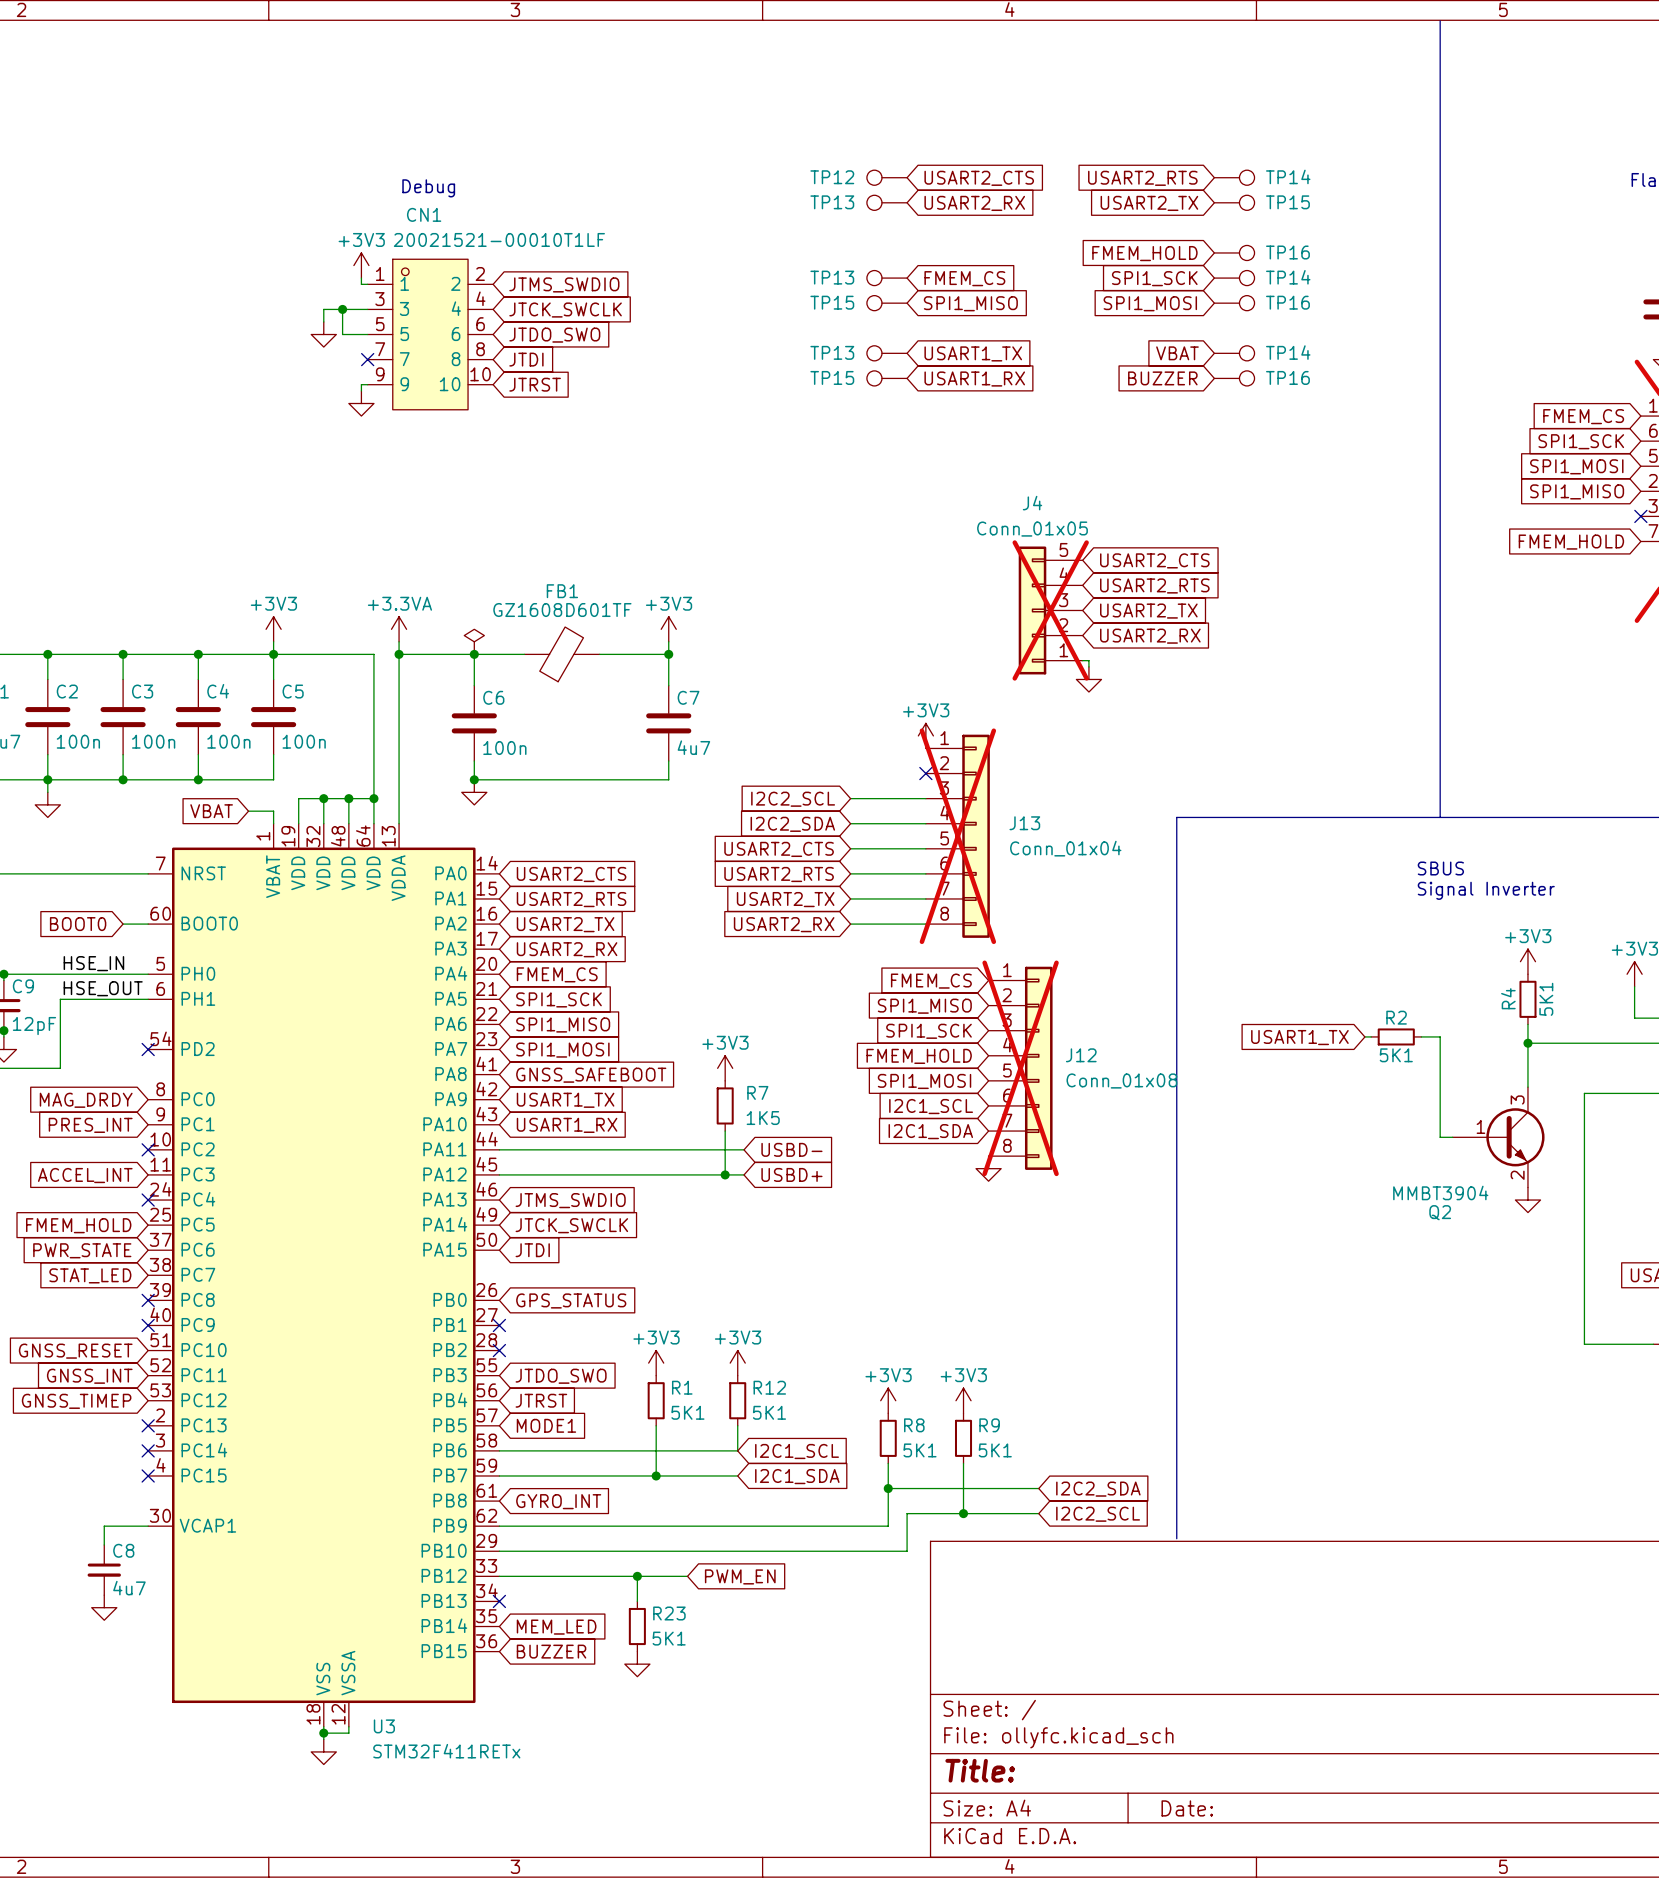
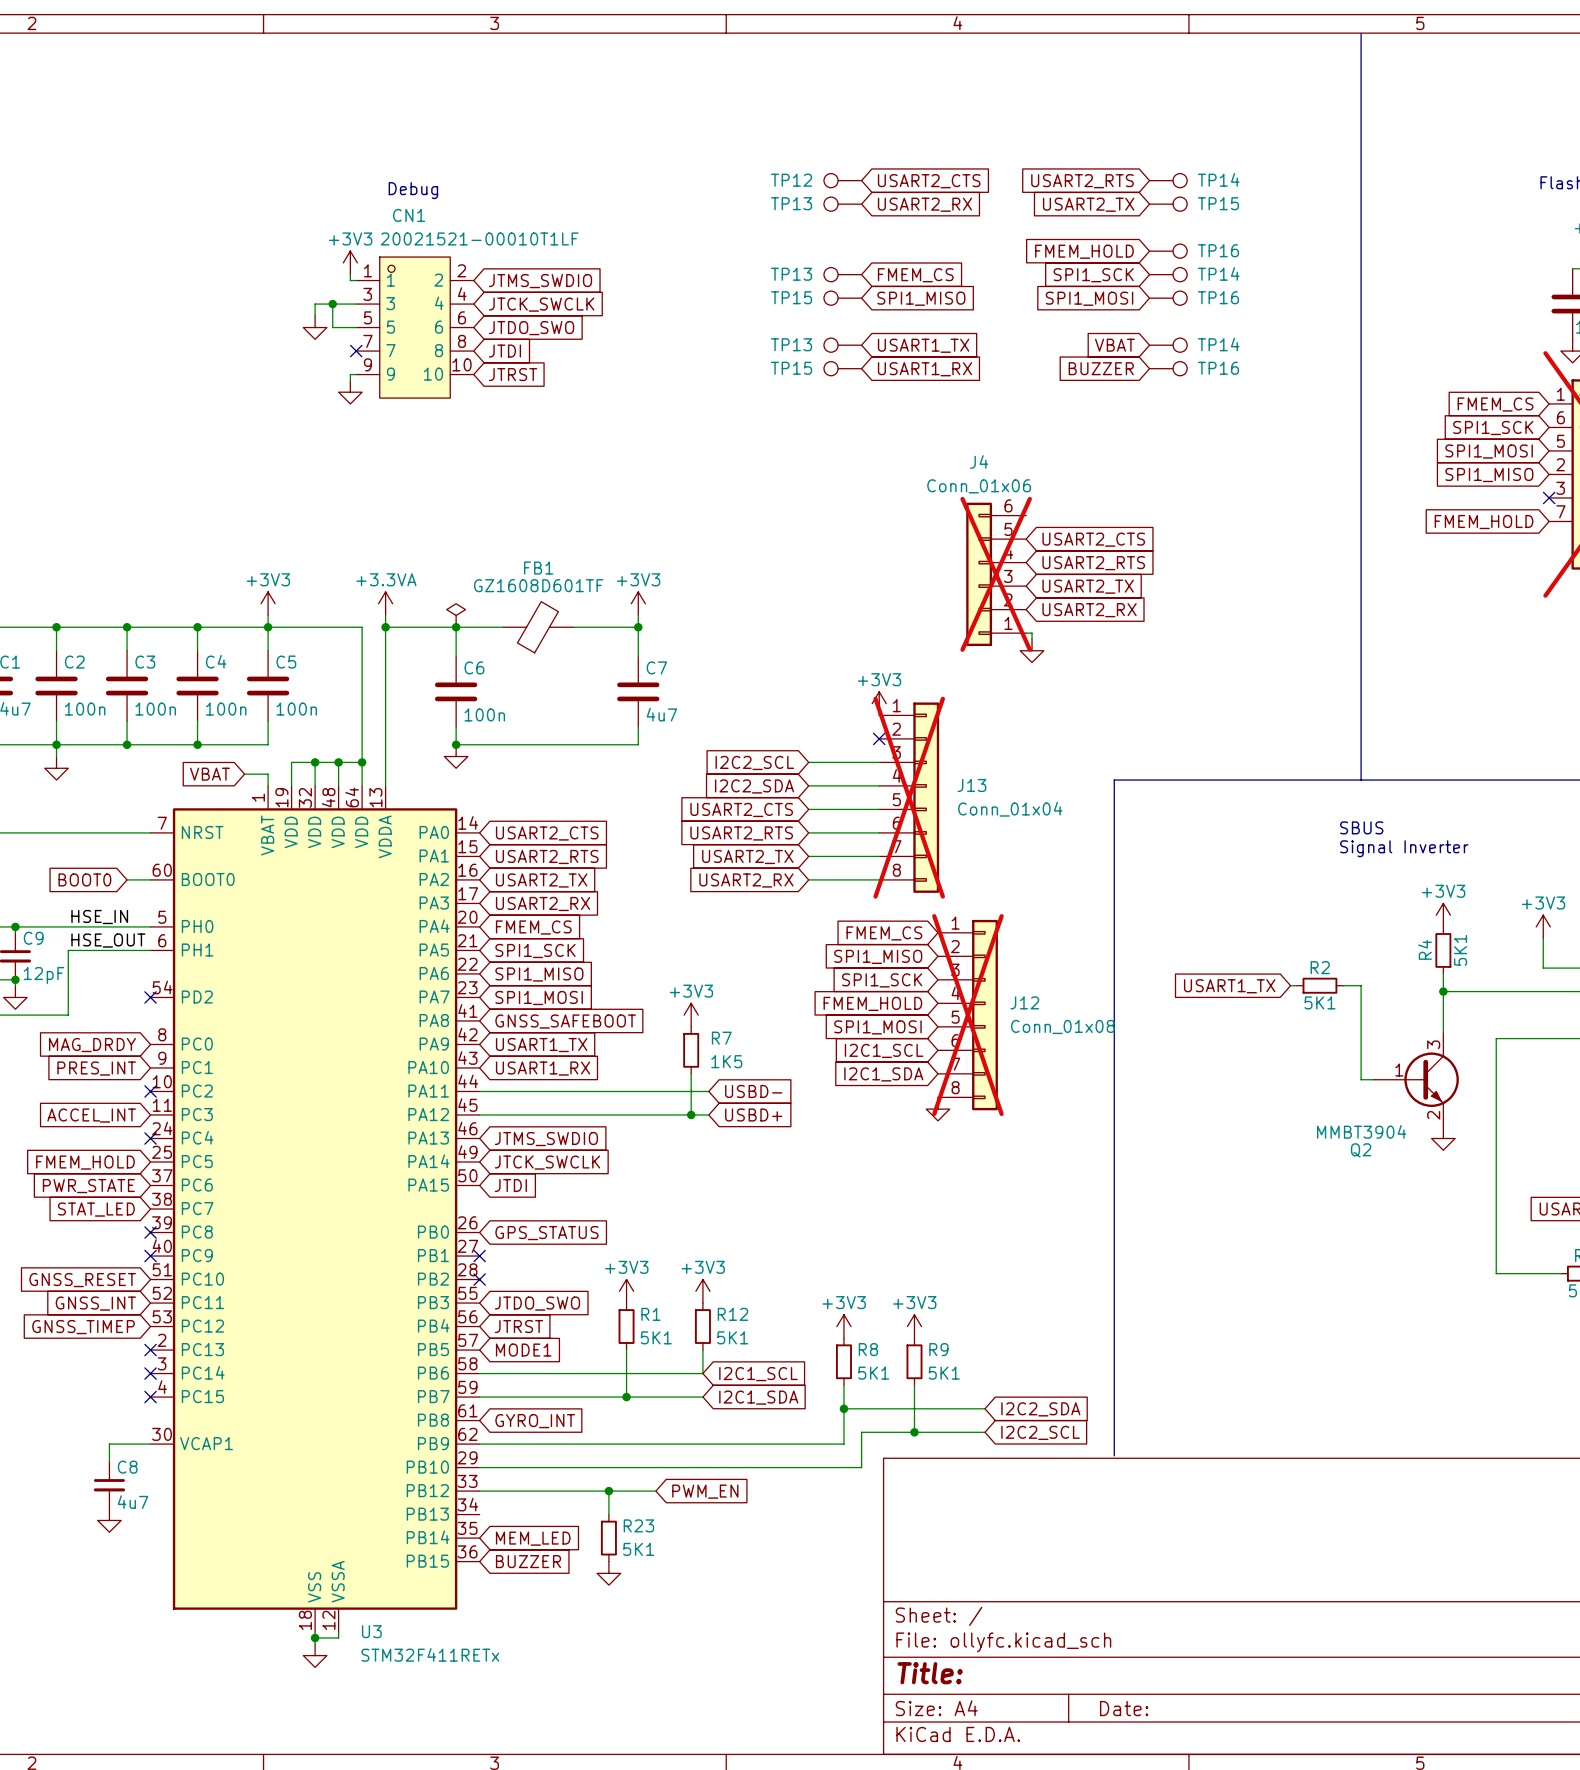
J4 value: Conn_01x05 (1032, 529) -> Conn_01x06 (979, 486)
J4 symbol: [1018, 546, 1083, 675] -> [966, 502, 1027, 647]
no-connect mark: (499, 1601) -> none

